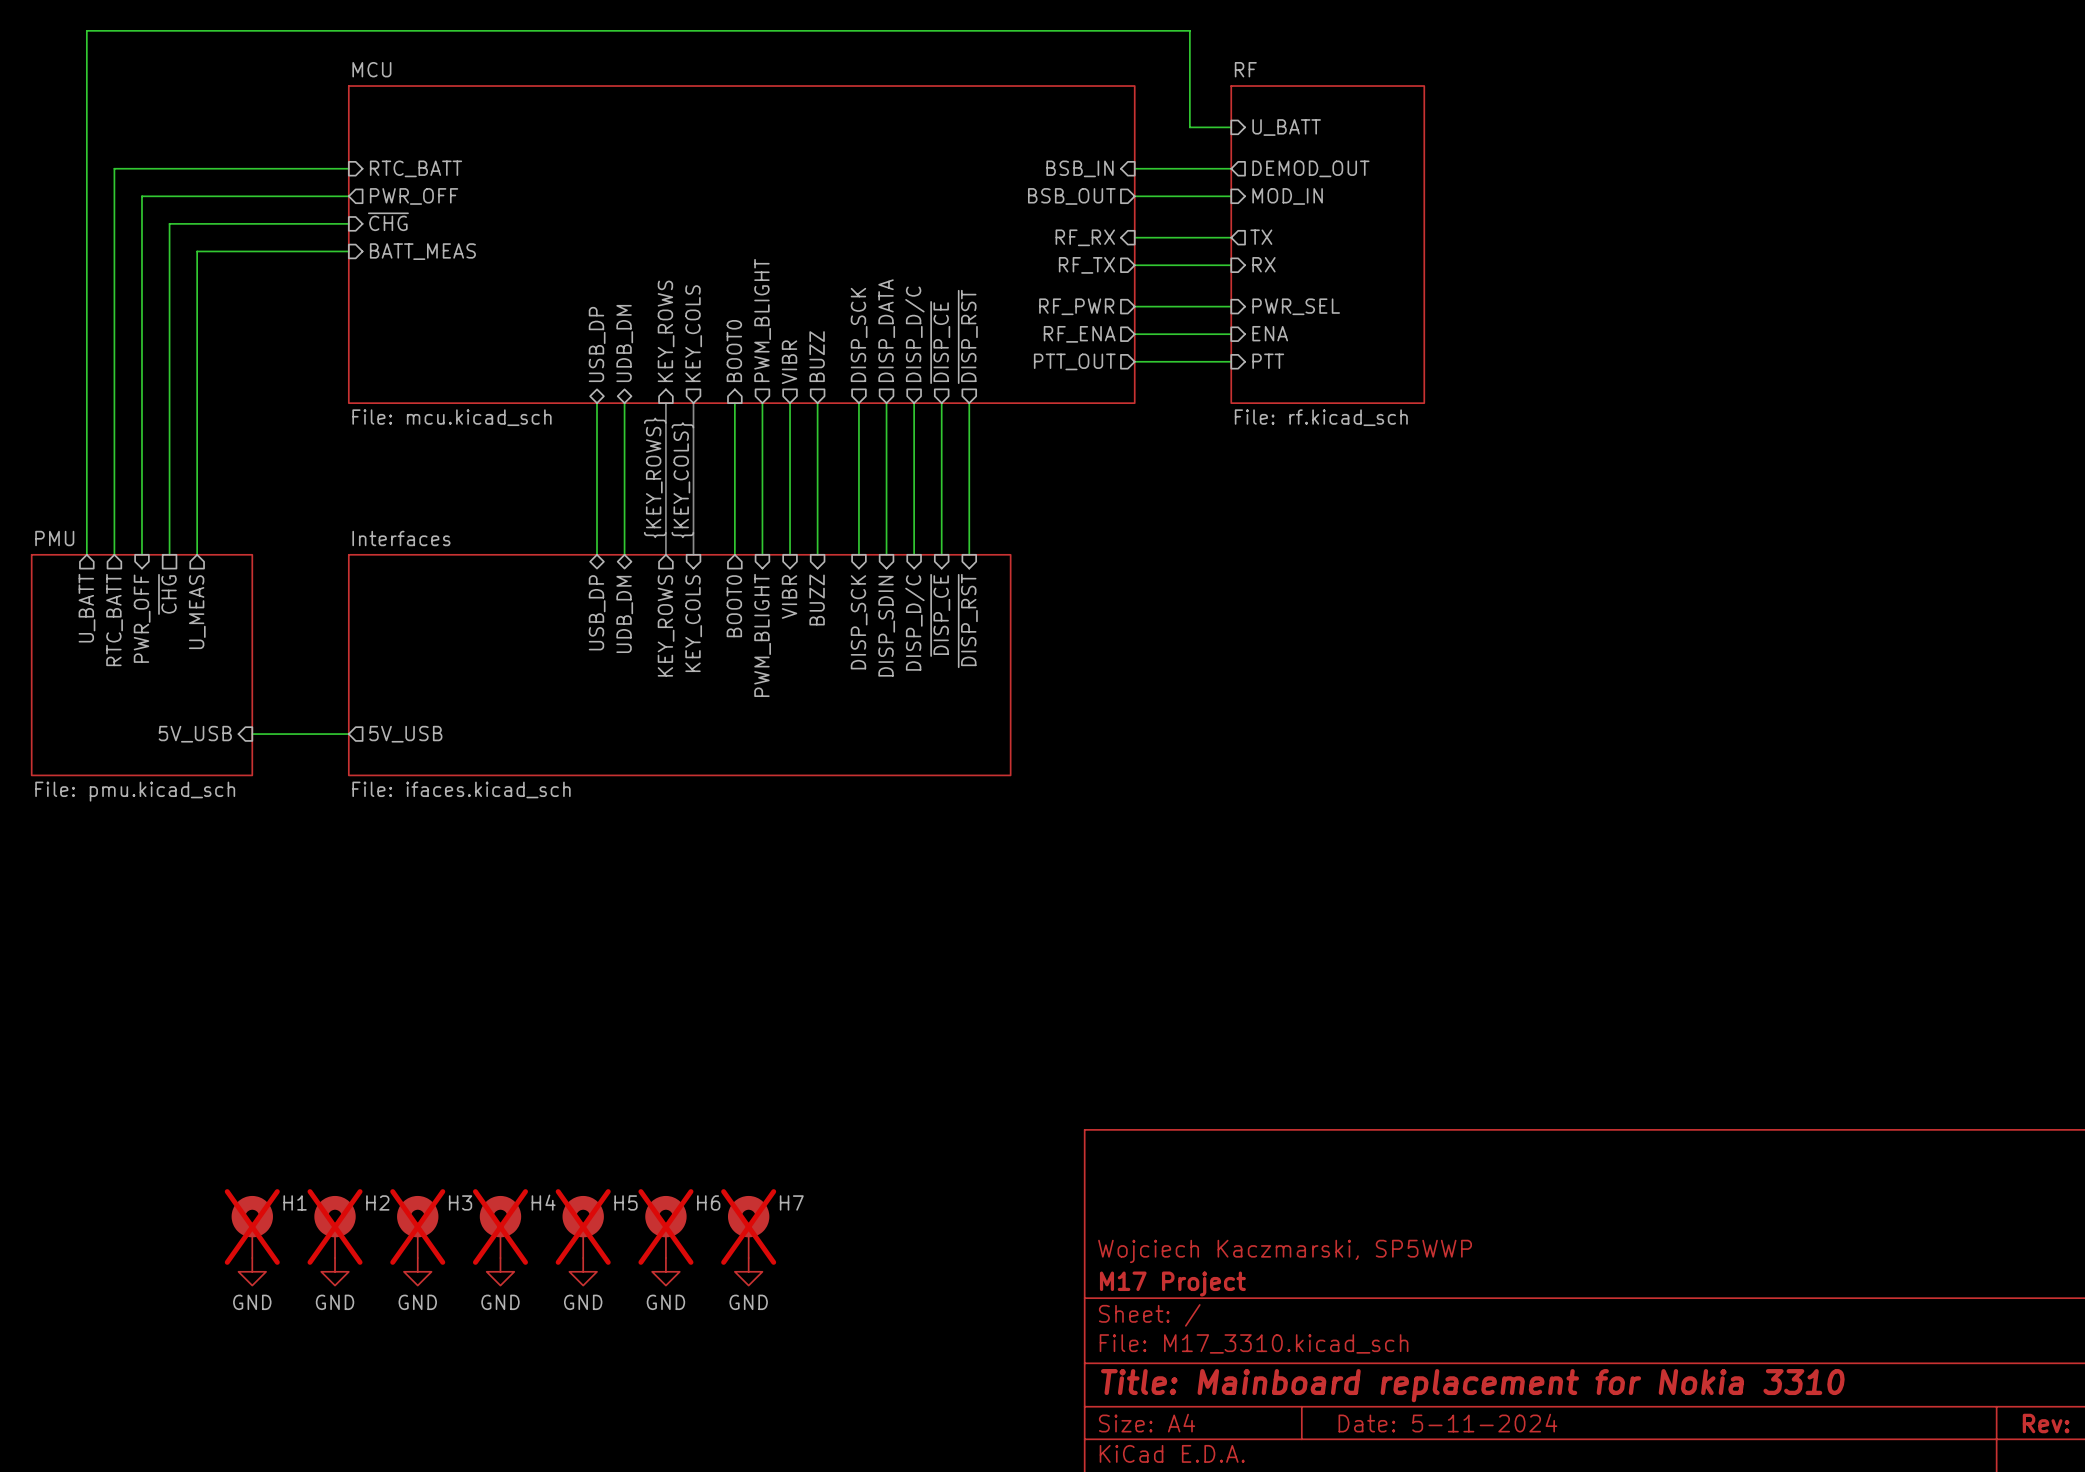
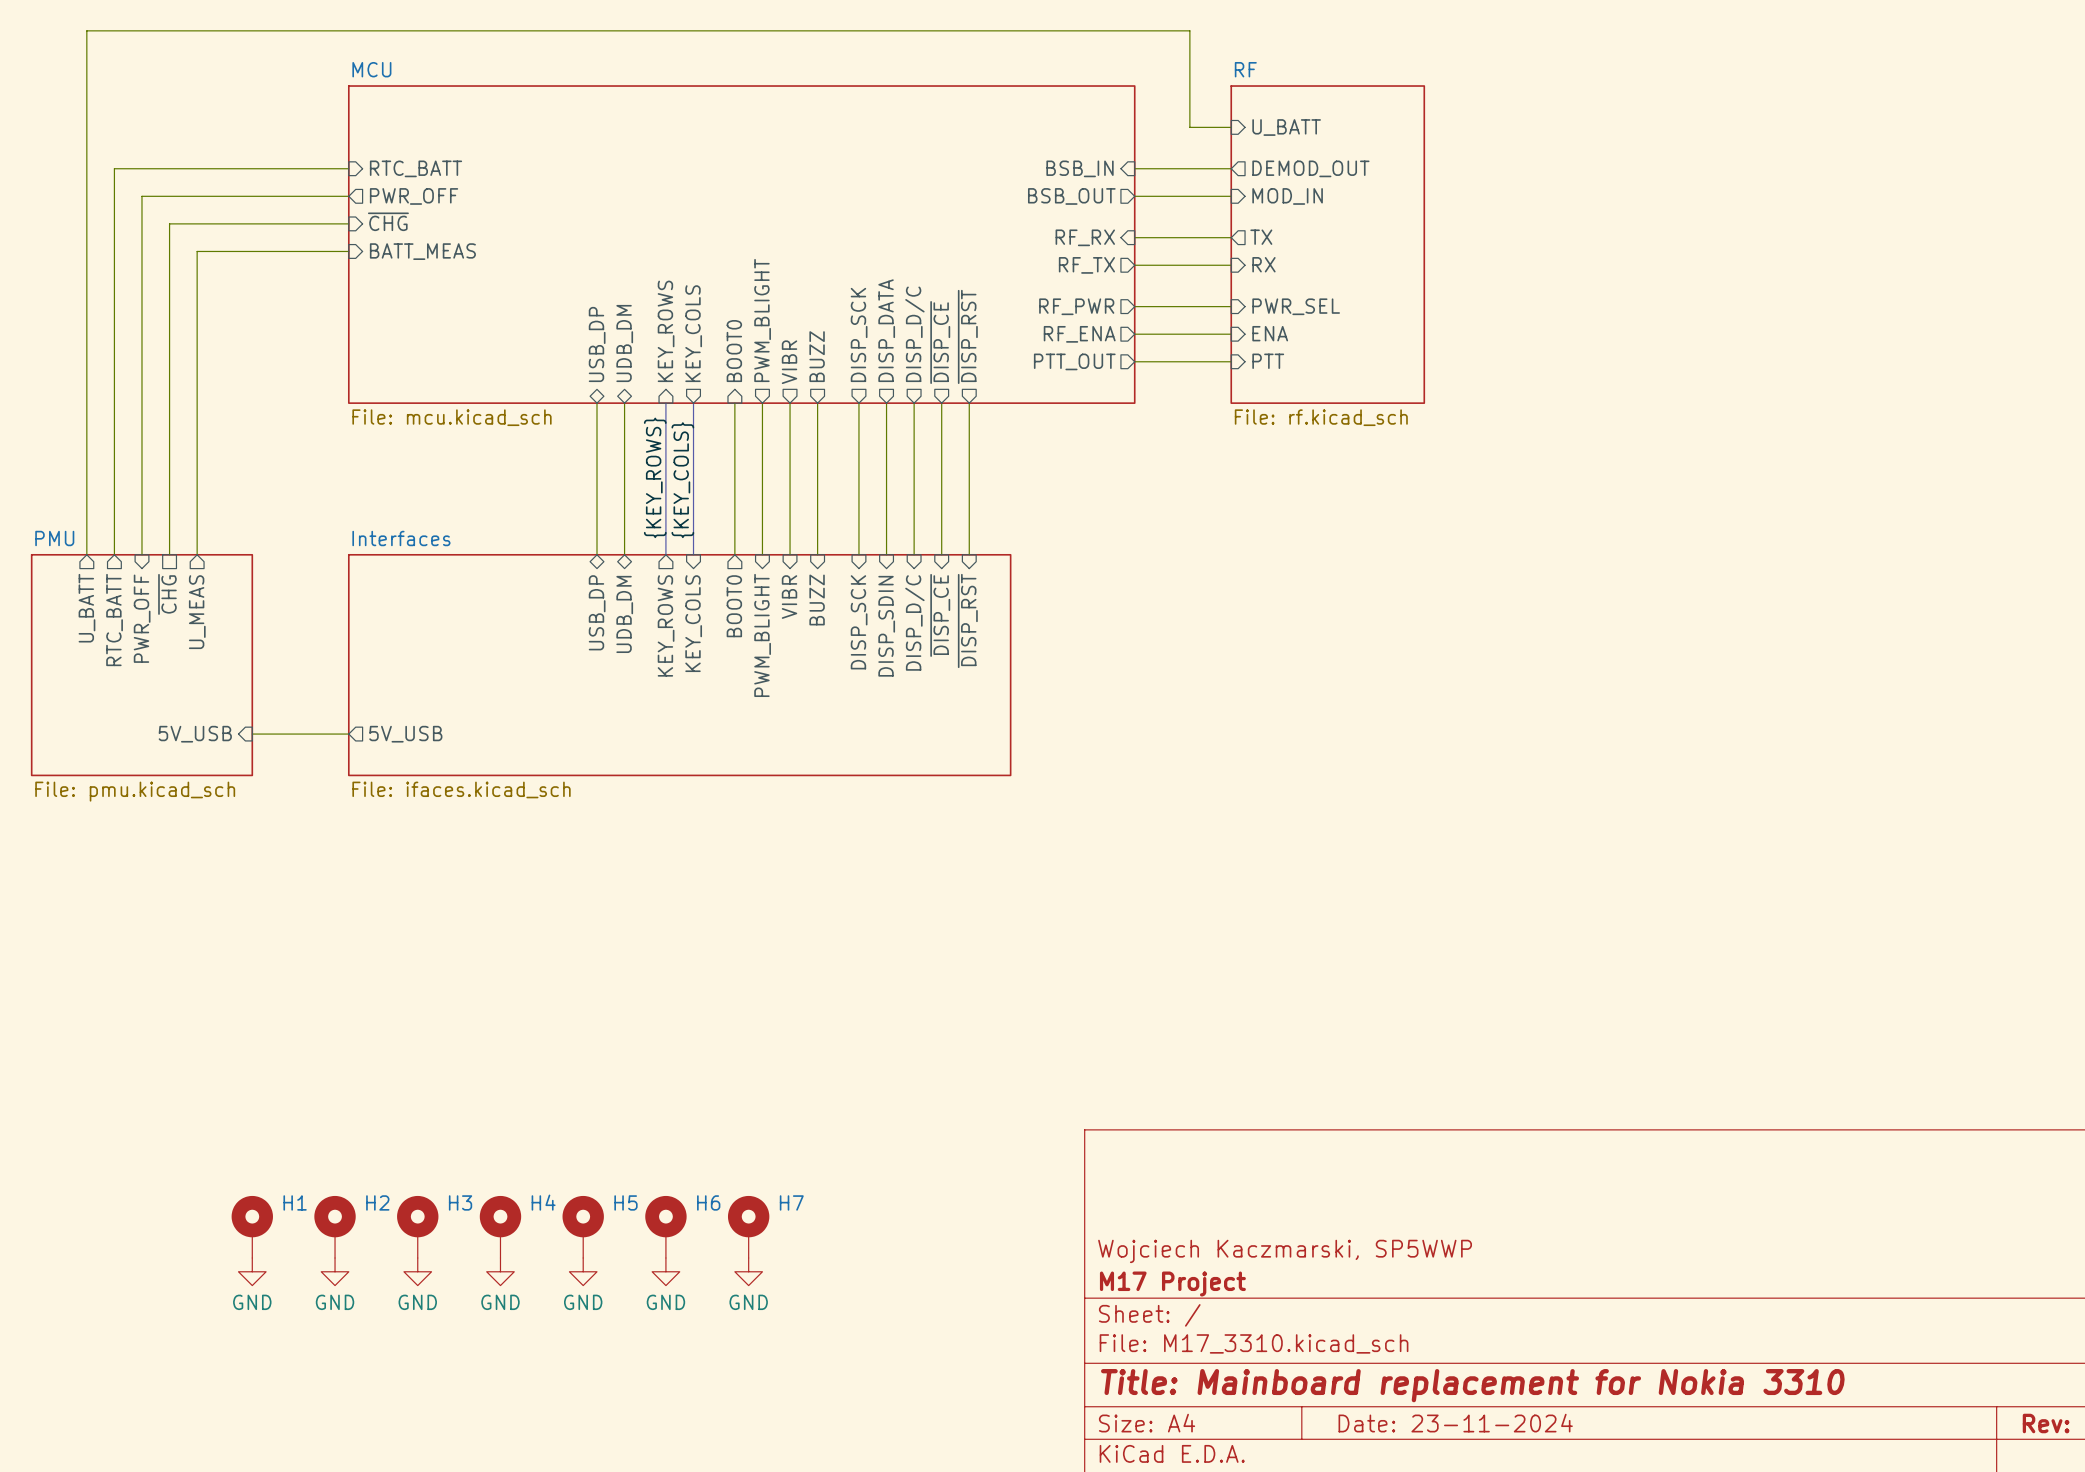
H1 do-not-place cross: (252, 1226) -> none
H2 do-not-place cross: (335, 1226) -> none
H3 do-not-place cross: (417, 1226) -> none
H4 do-not-place cross: (500, 1226) -> none
H5 do-not-place cross: (583, 1226) -> none
H6 do-not-place cross: (665, 1226) -> none
H7 do-not-place cross: (748, 1226) -> none
title block: Date: 5-11-2024 (1447, 1423) -> Date: 23-11-2024 (1455, 1423)

